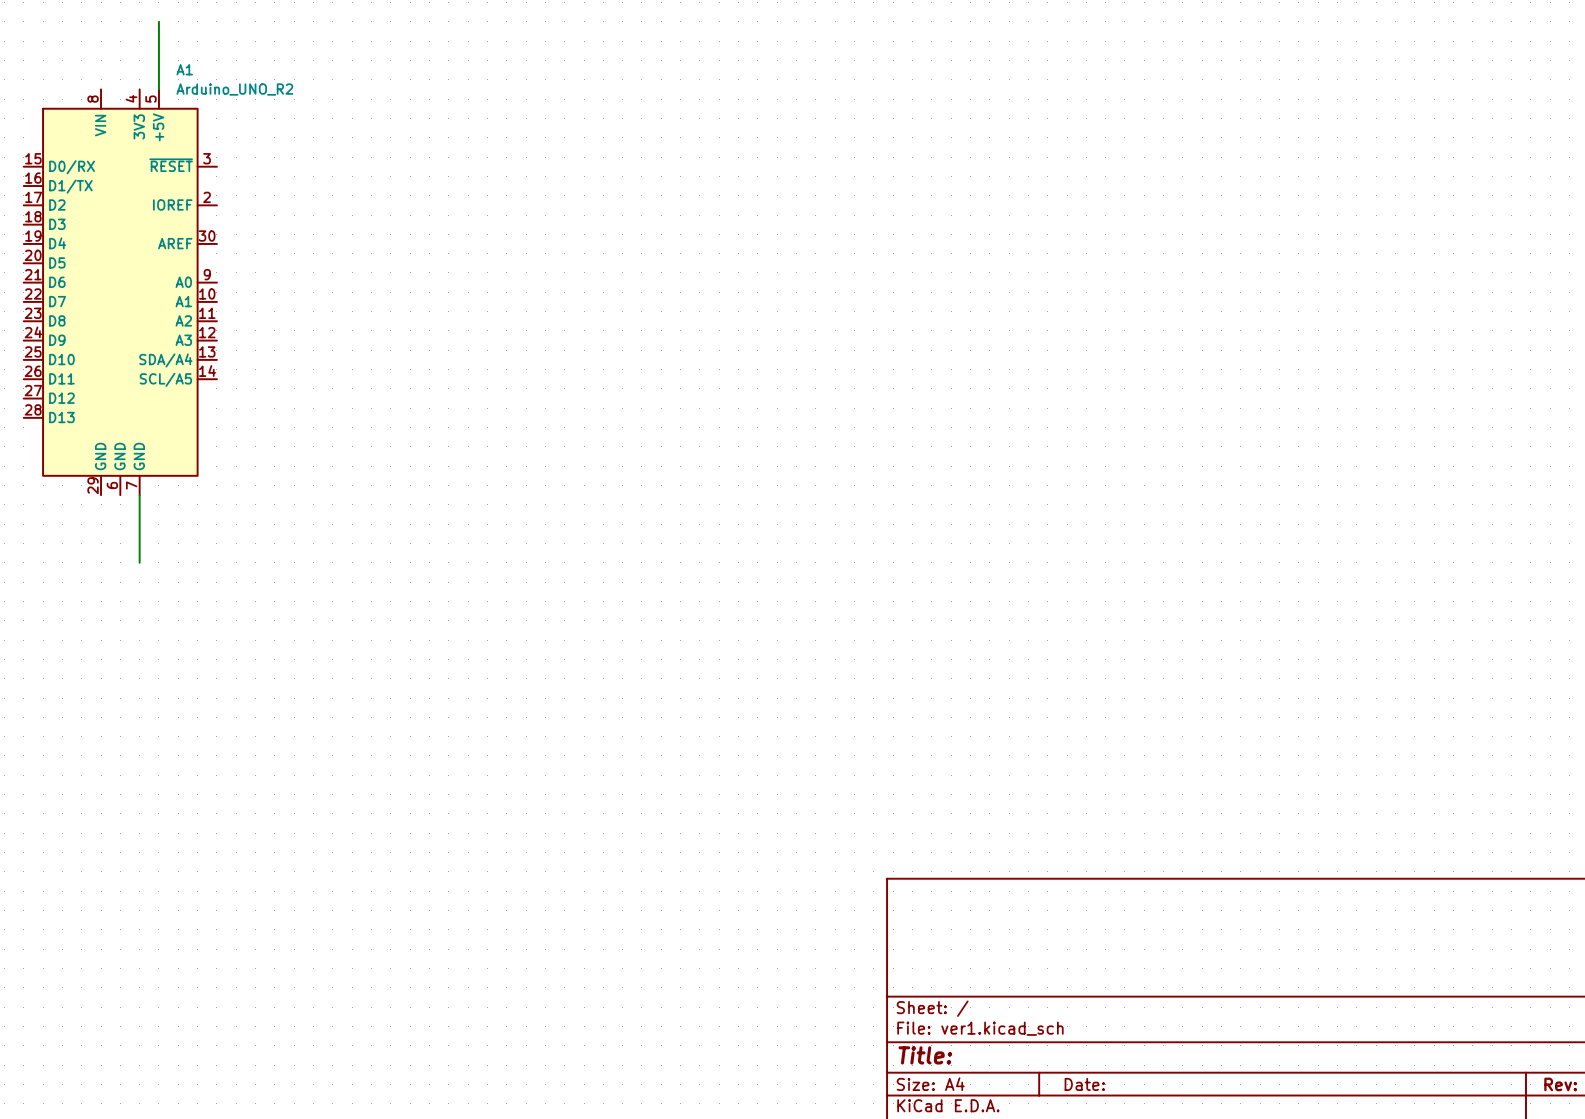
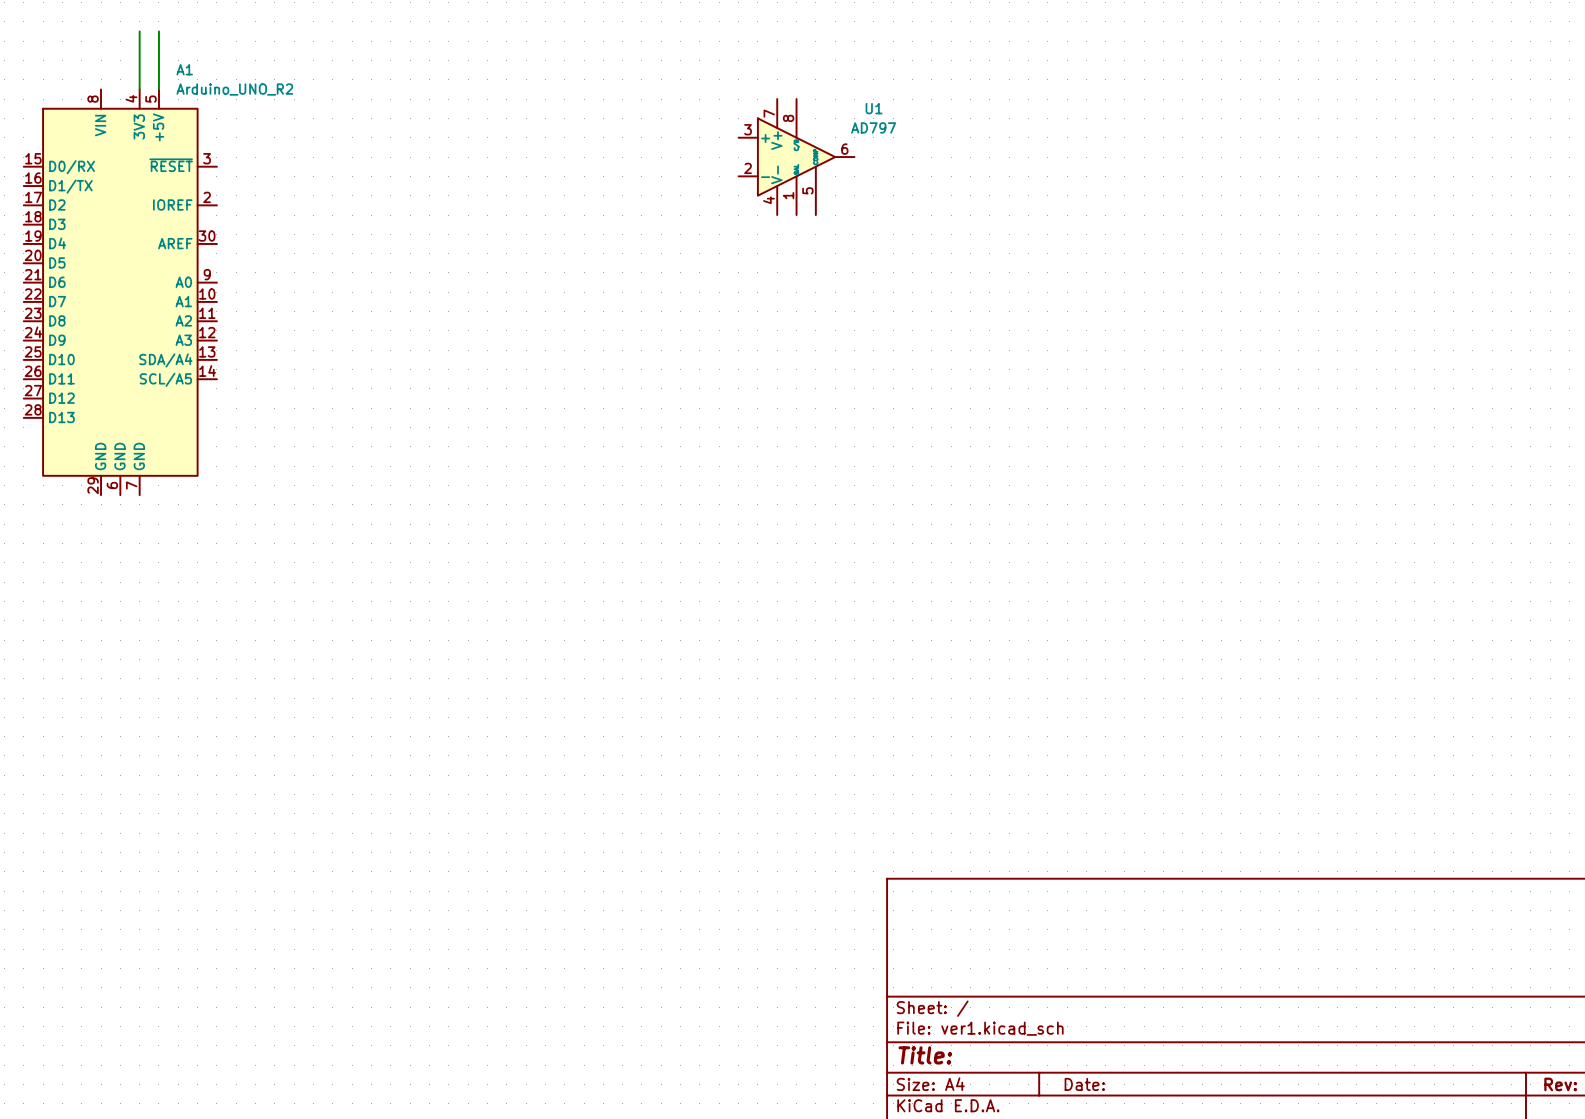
wire: (158, 21) (158, 31) -> none
wire: none -> (139, 31) (139, 89)
U1: none -> AD797 (796, 157)
wire: (139, 495) (139, 562) -> none

